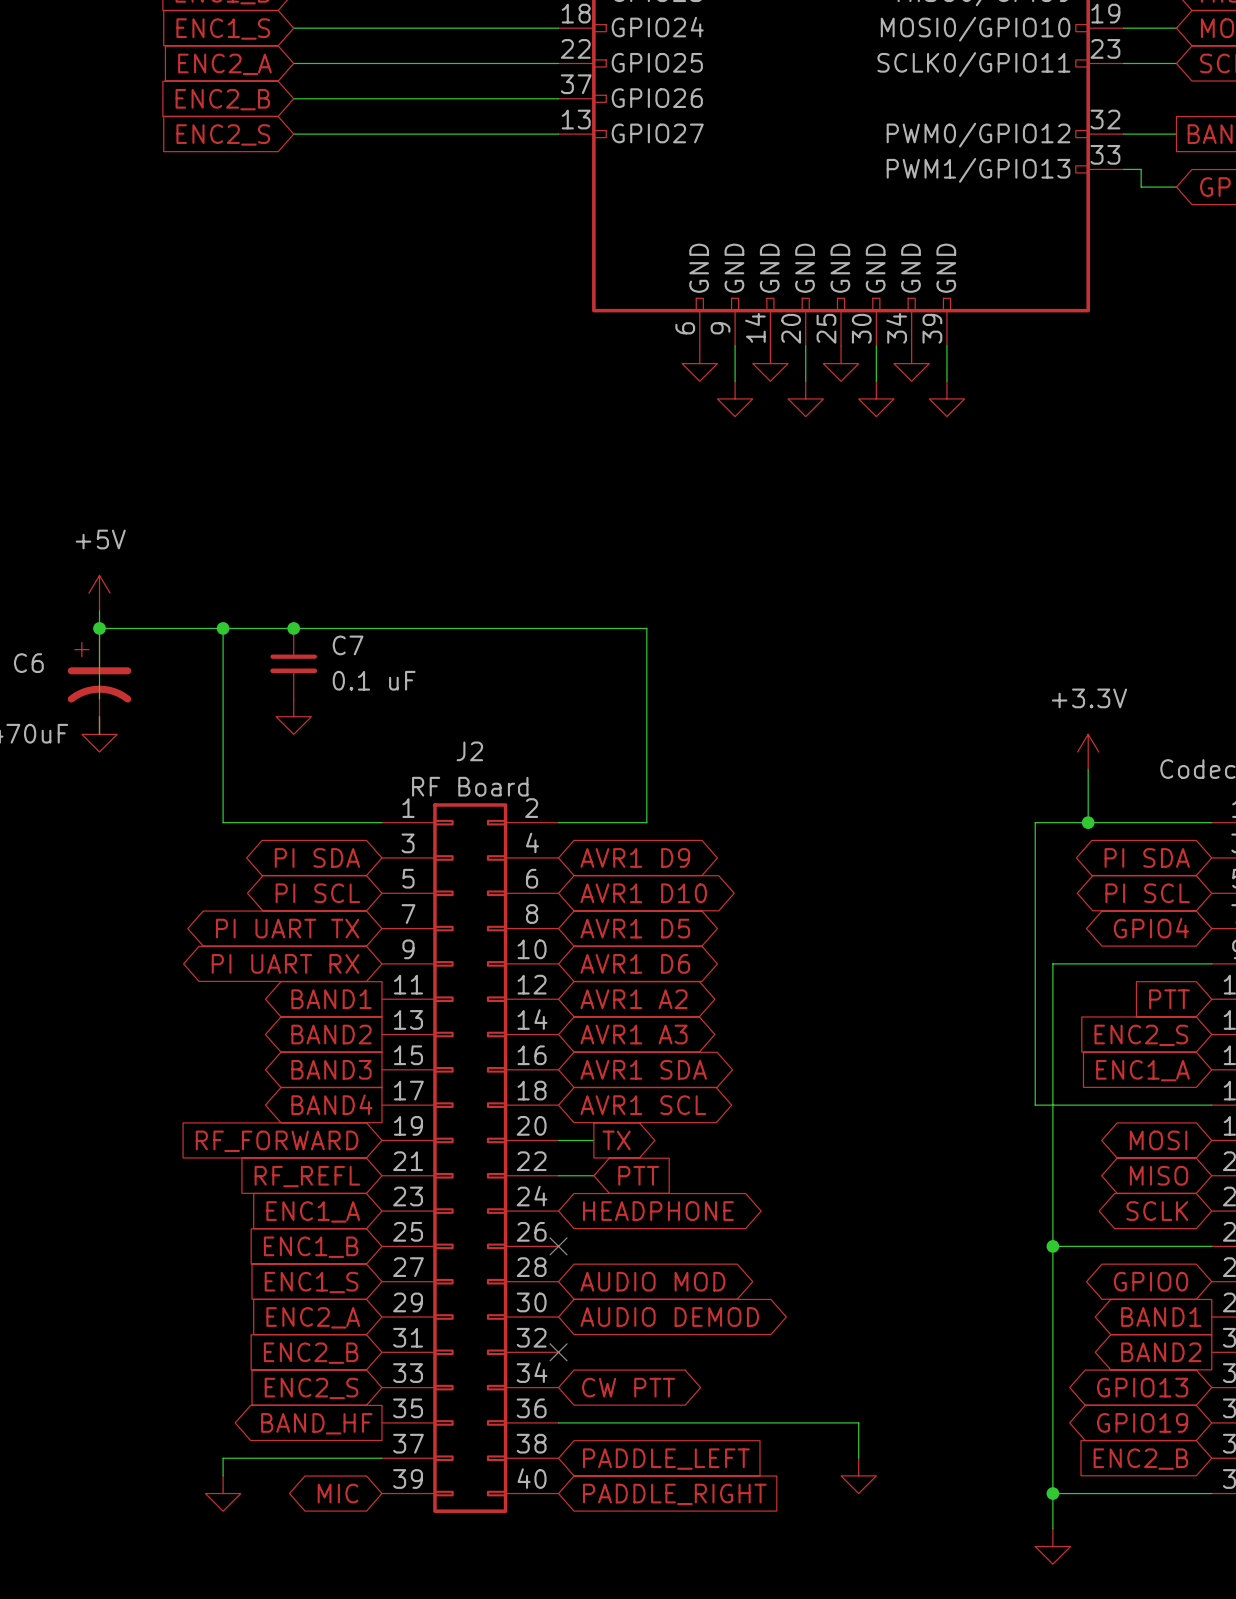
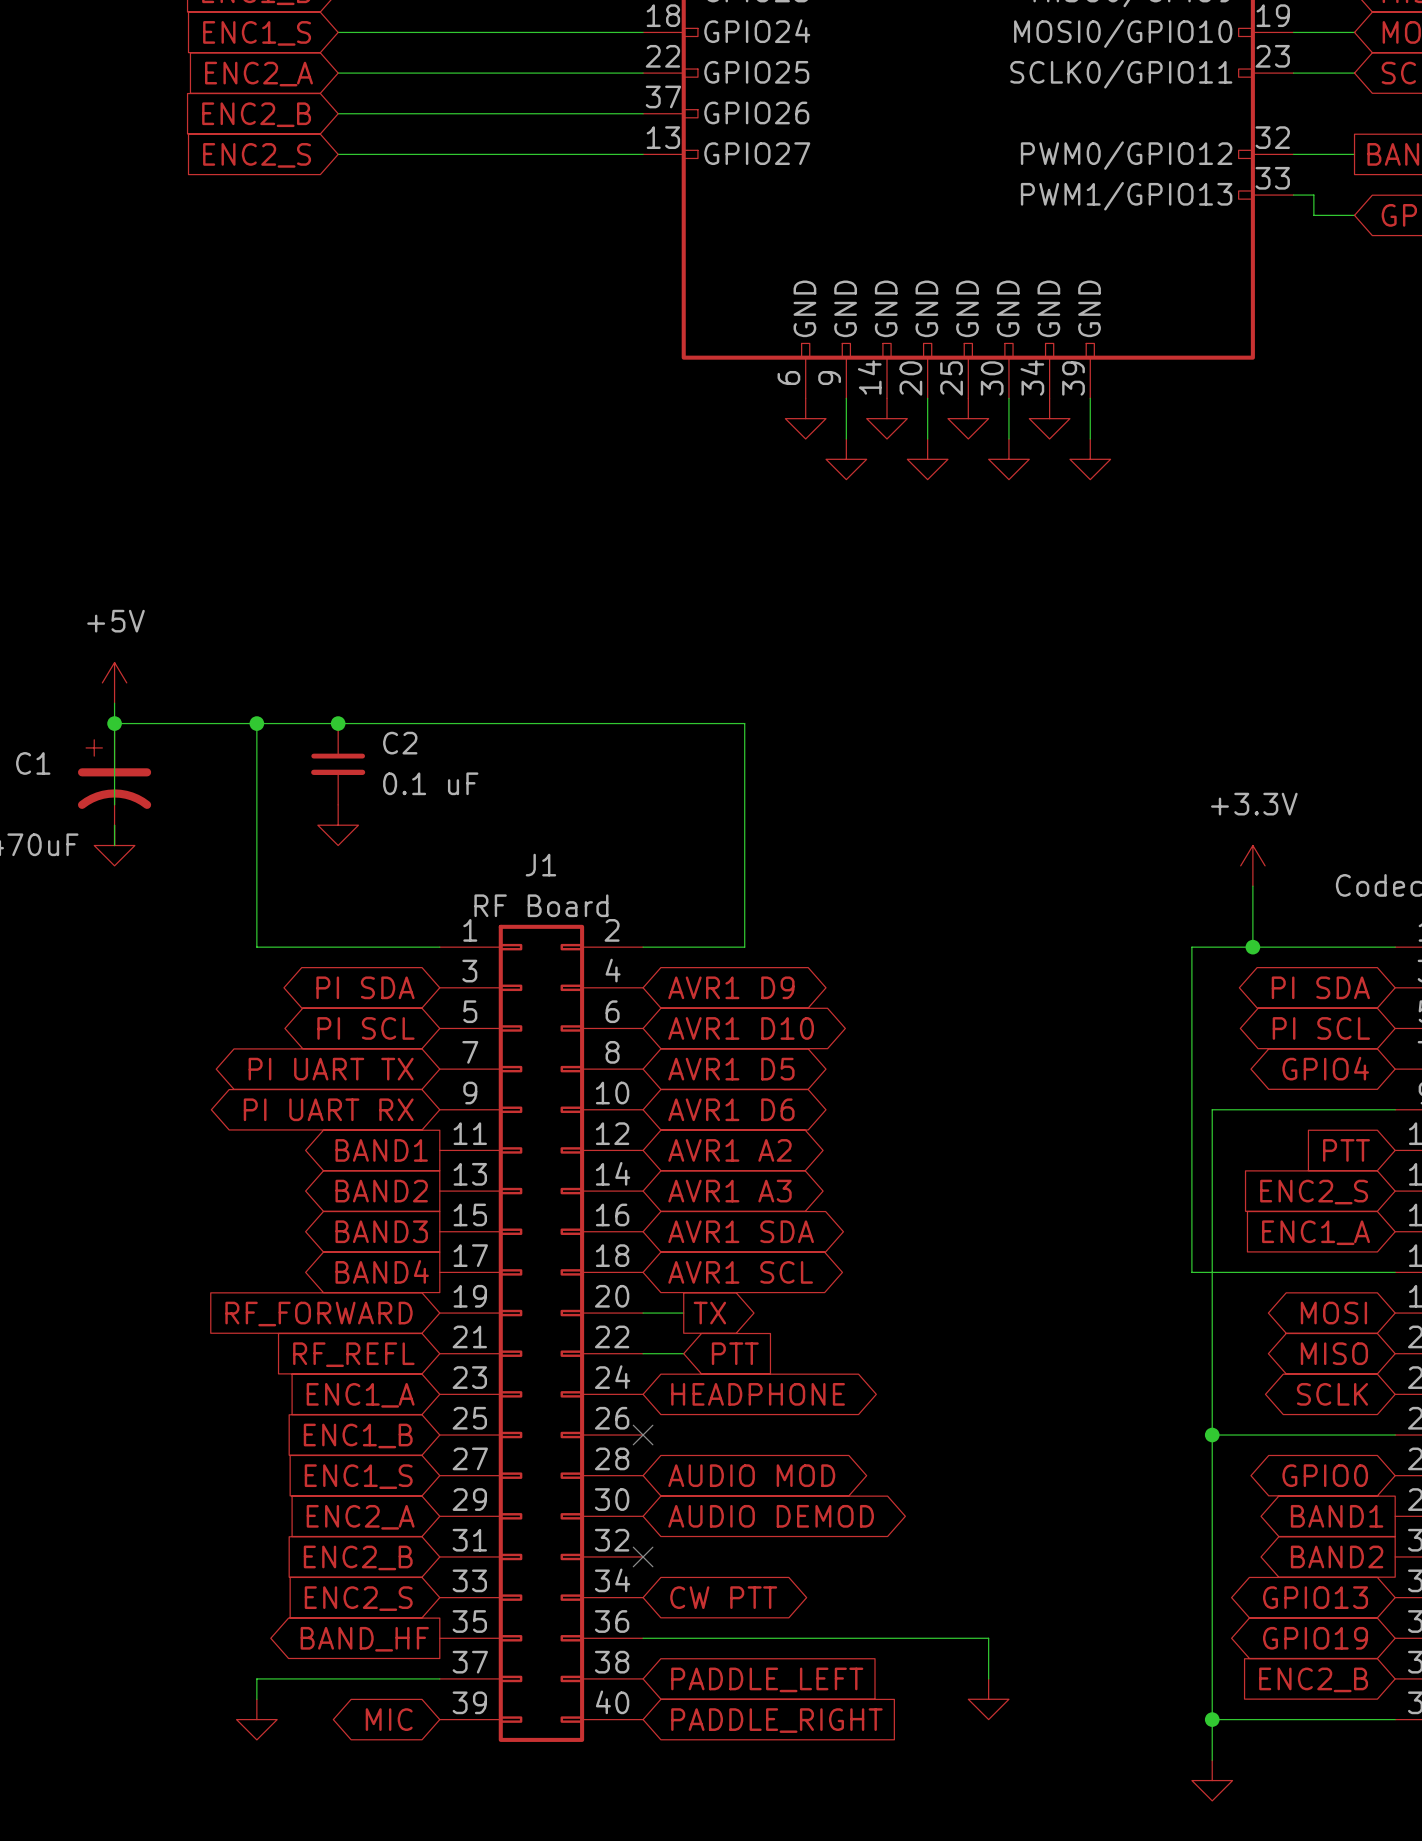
C7 name: C7 (348, 645) -> C2 (400, 743)
C6 name: C6 (28, 663) -> C1 (33, 763)
J2 name: J2 (469, 751) -> J1 (540, 865)

